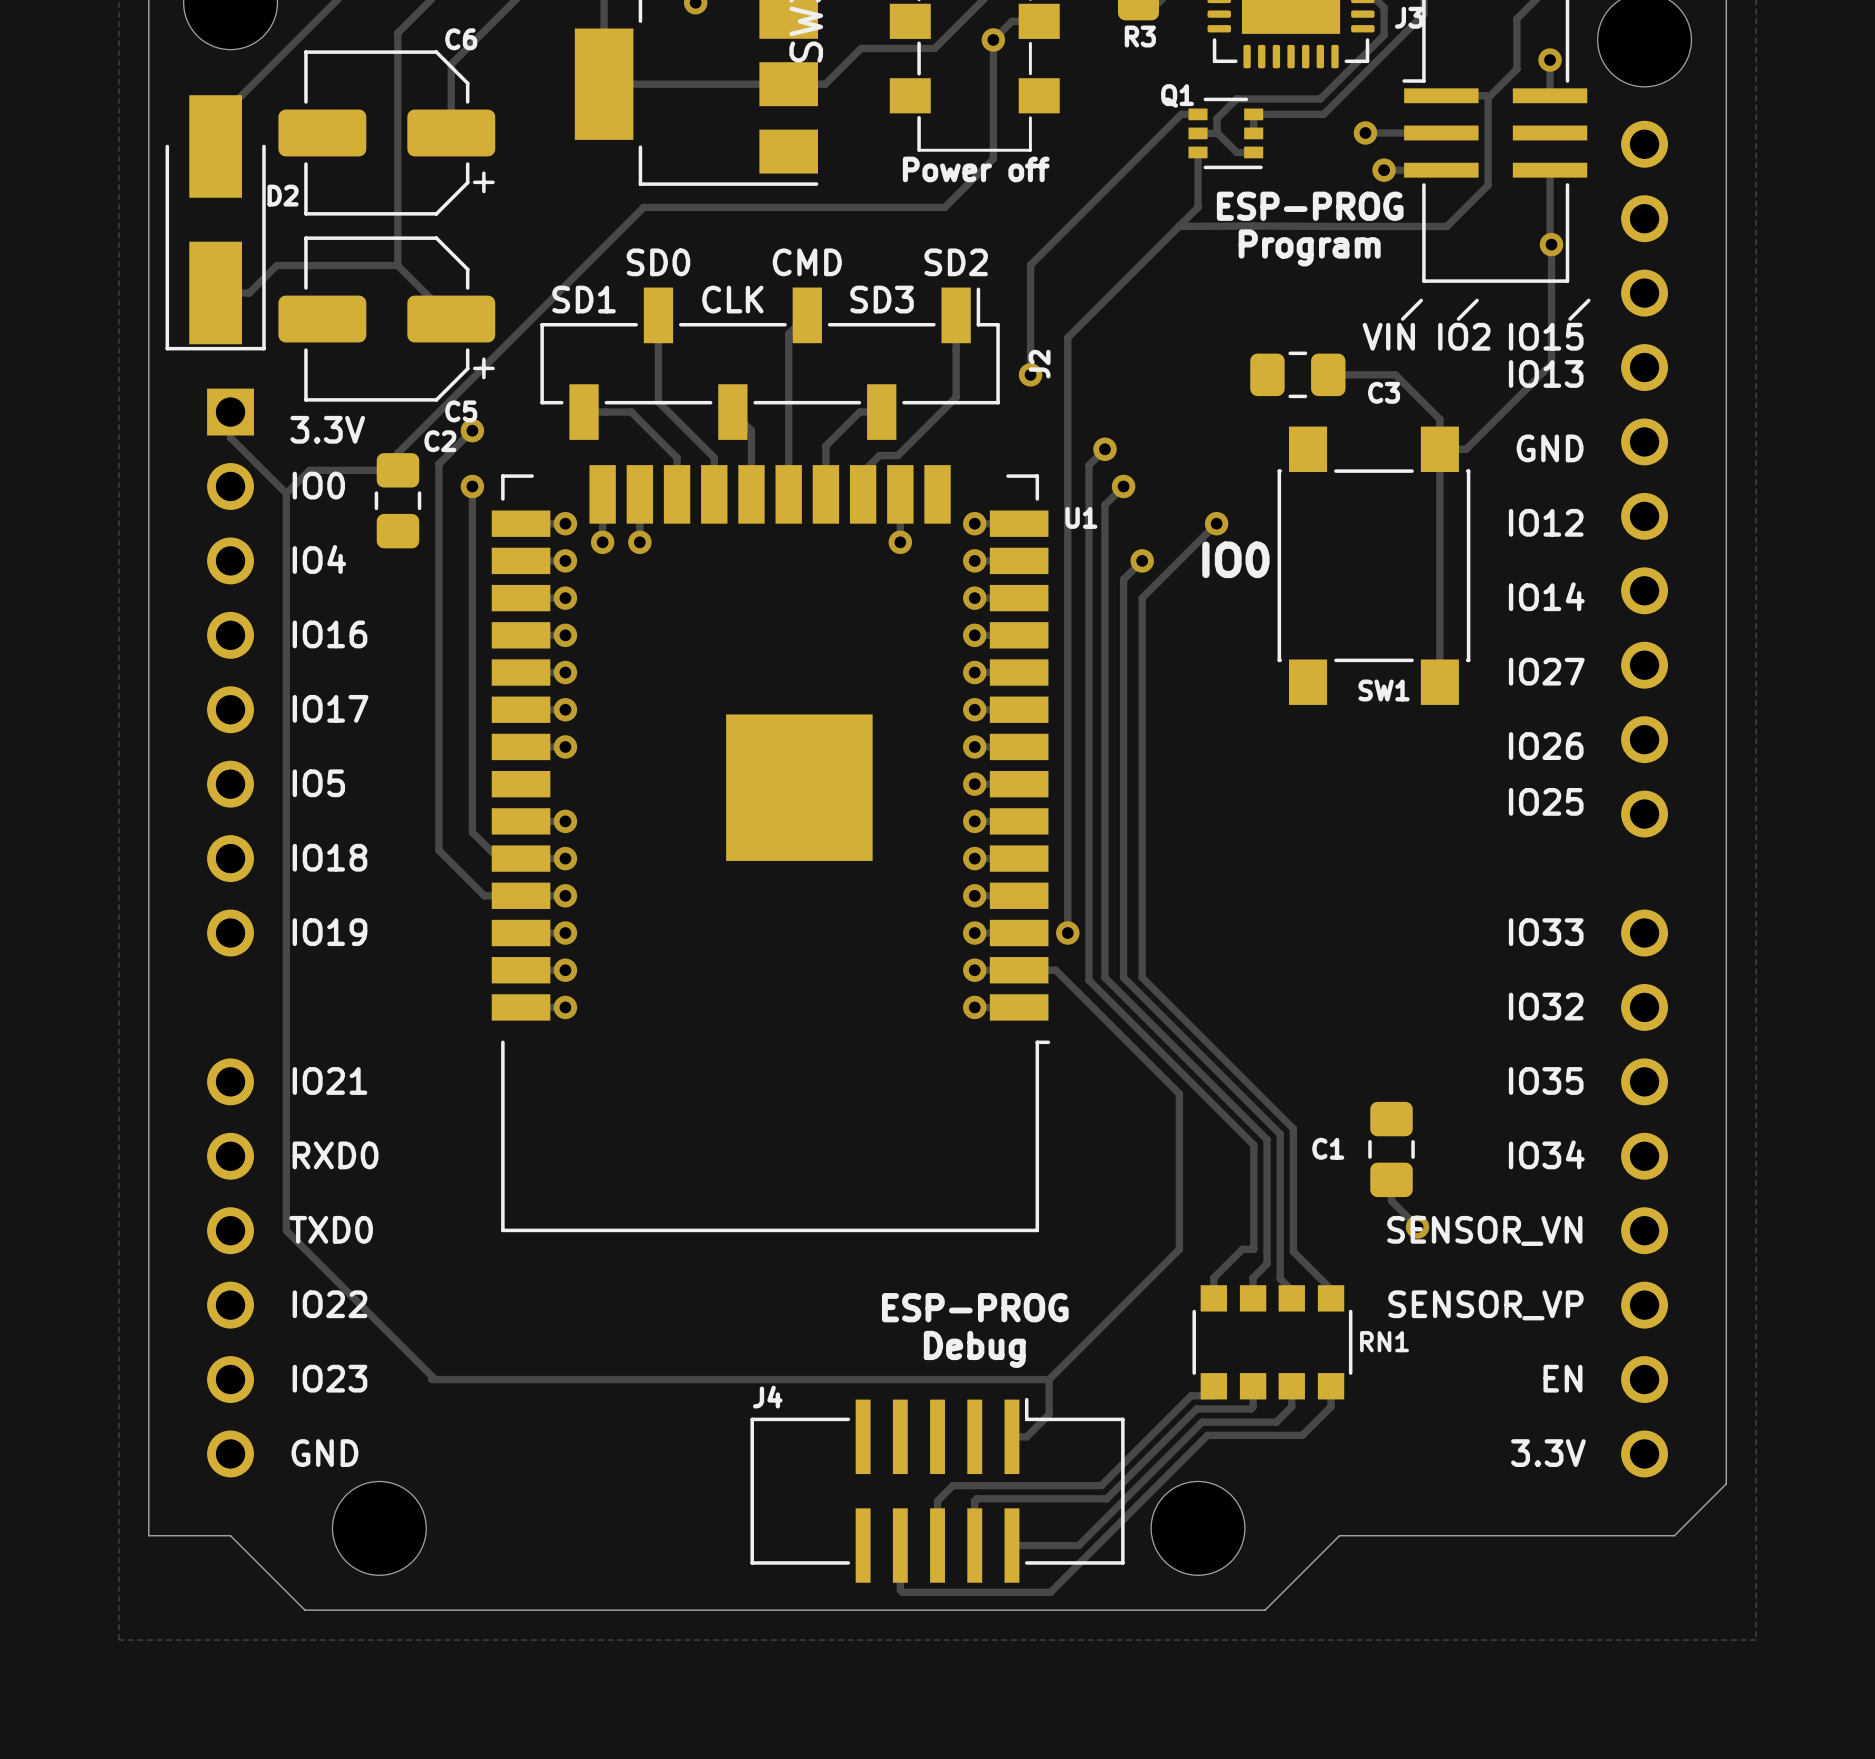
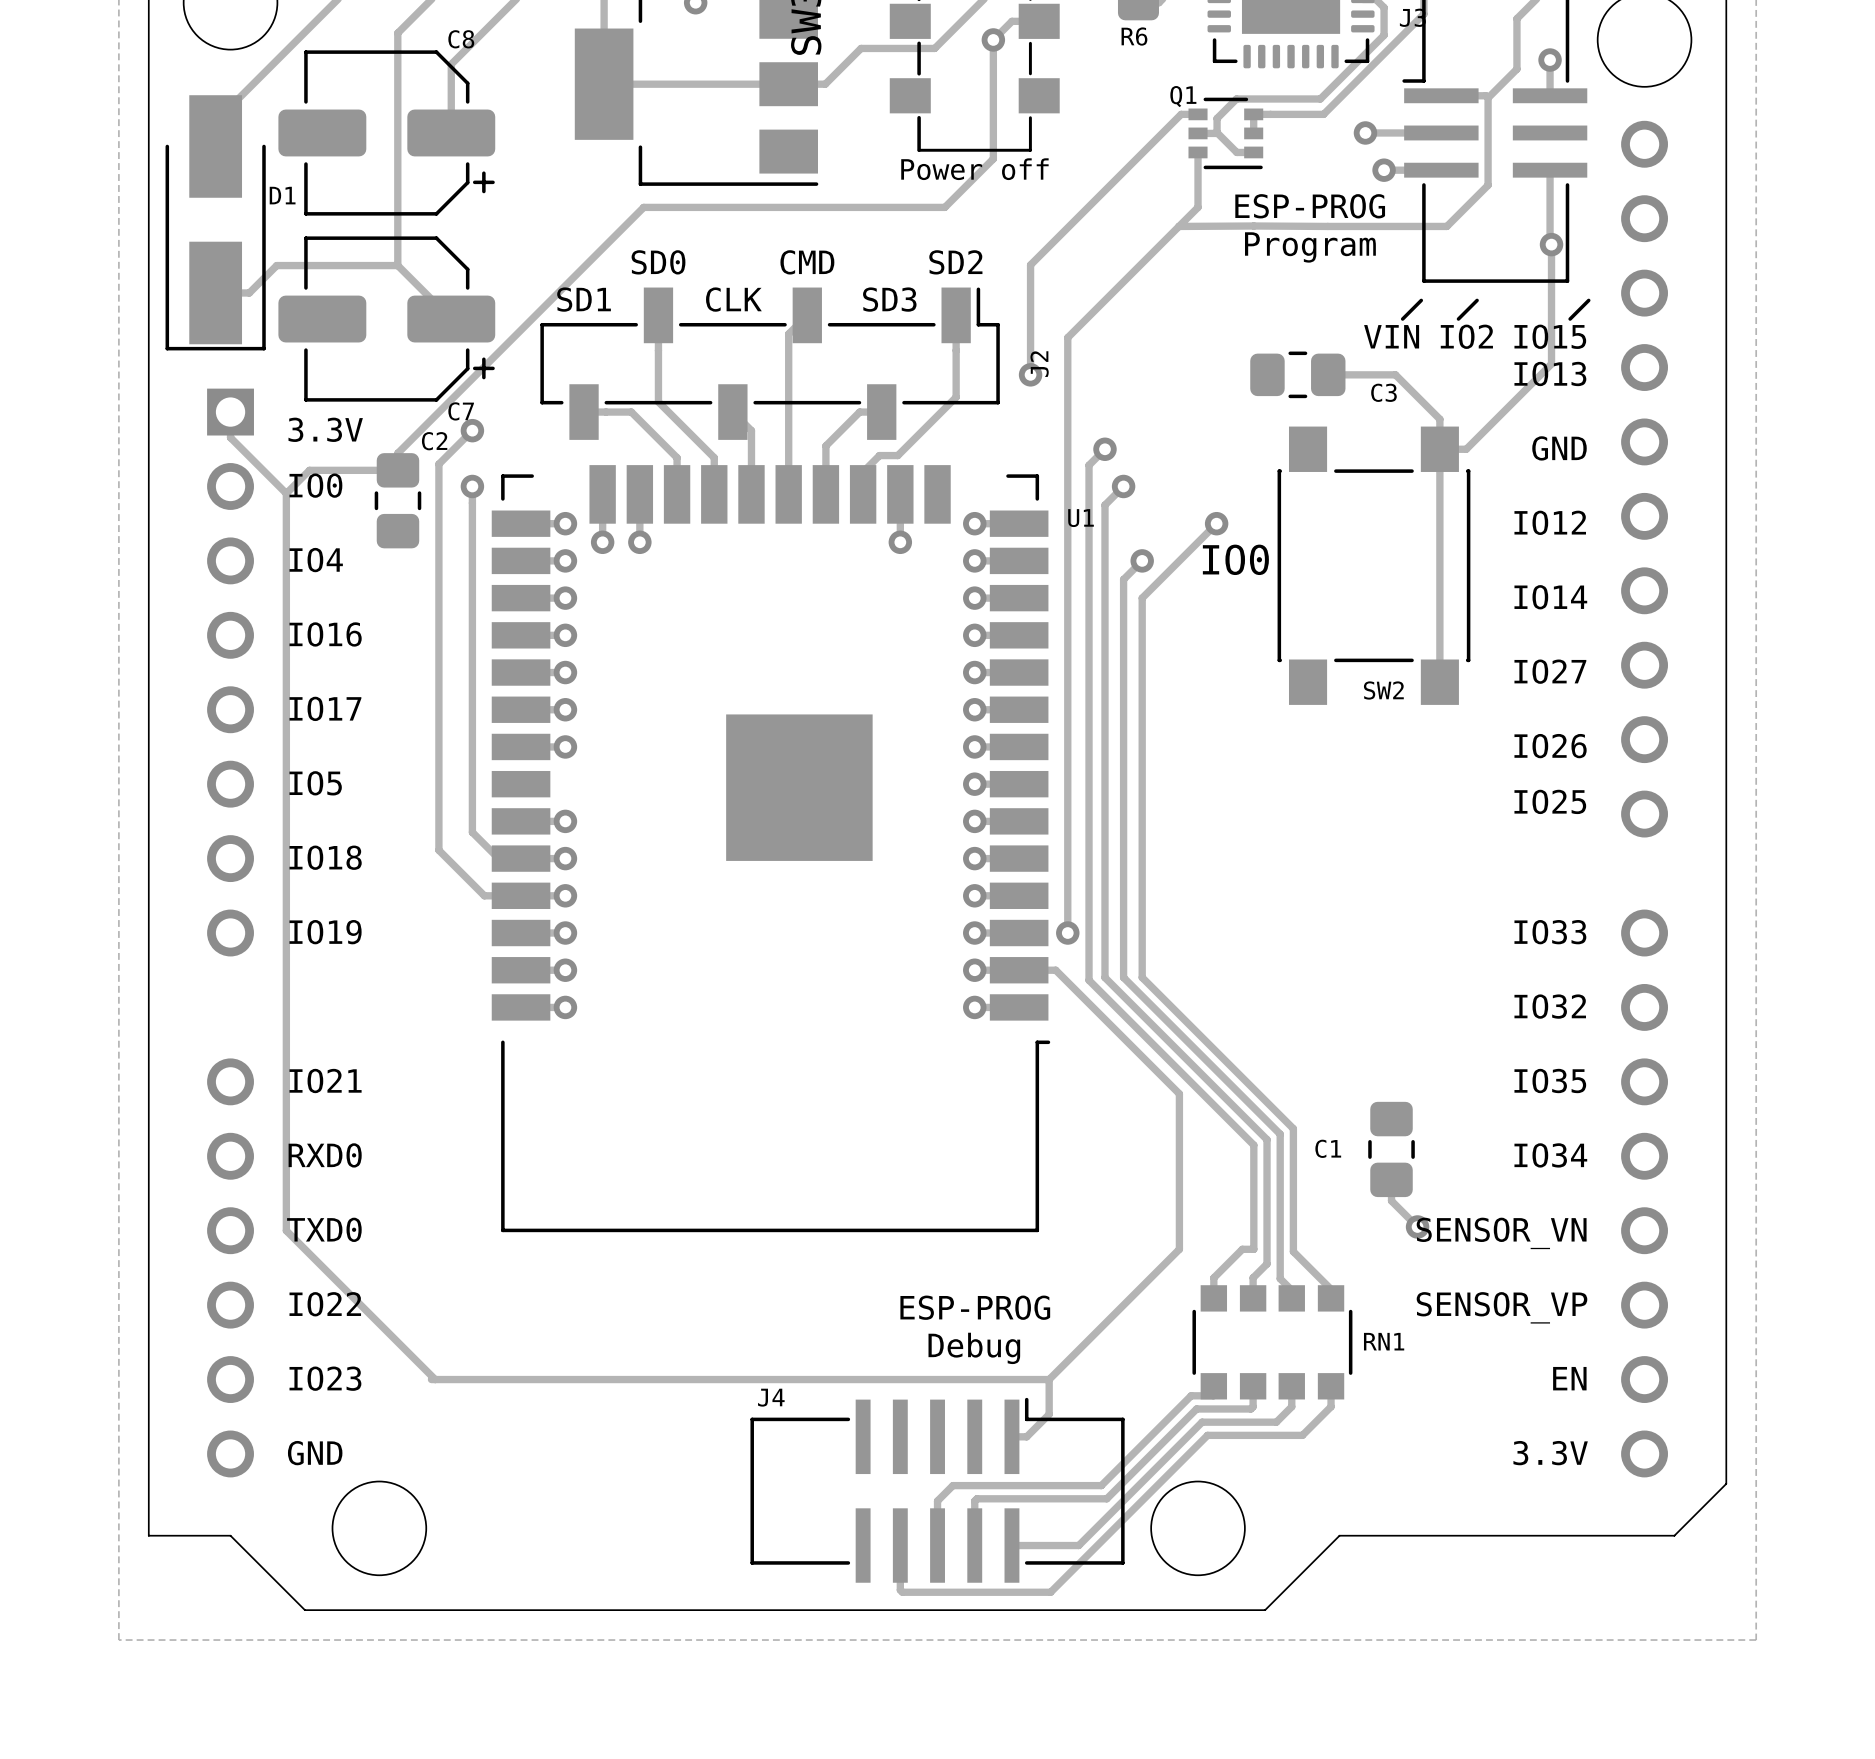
R3 name: R3 (1140, 36) -> R6 (1134, 36)
C6 name: C6 (461, 39) -> C8 (461, 39)
D2 name: D2 (283, 195) -> D1 (282, 195)
C5 name: C5 (461, 411) -> C7 (461, 411)
SW1 name: SW1 (1384, 690) -> SW2 (1383, 690)

